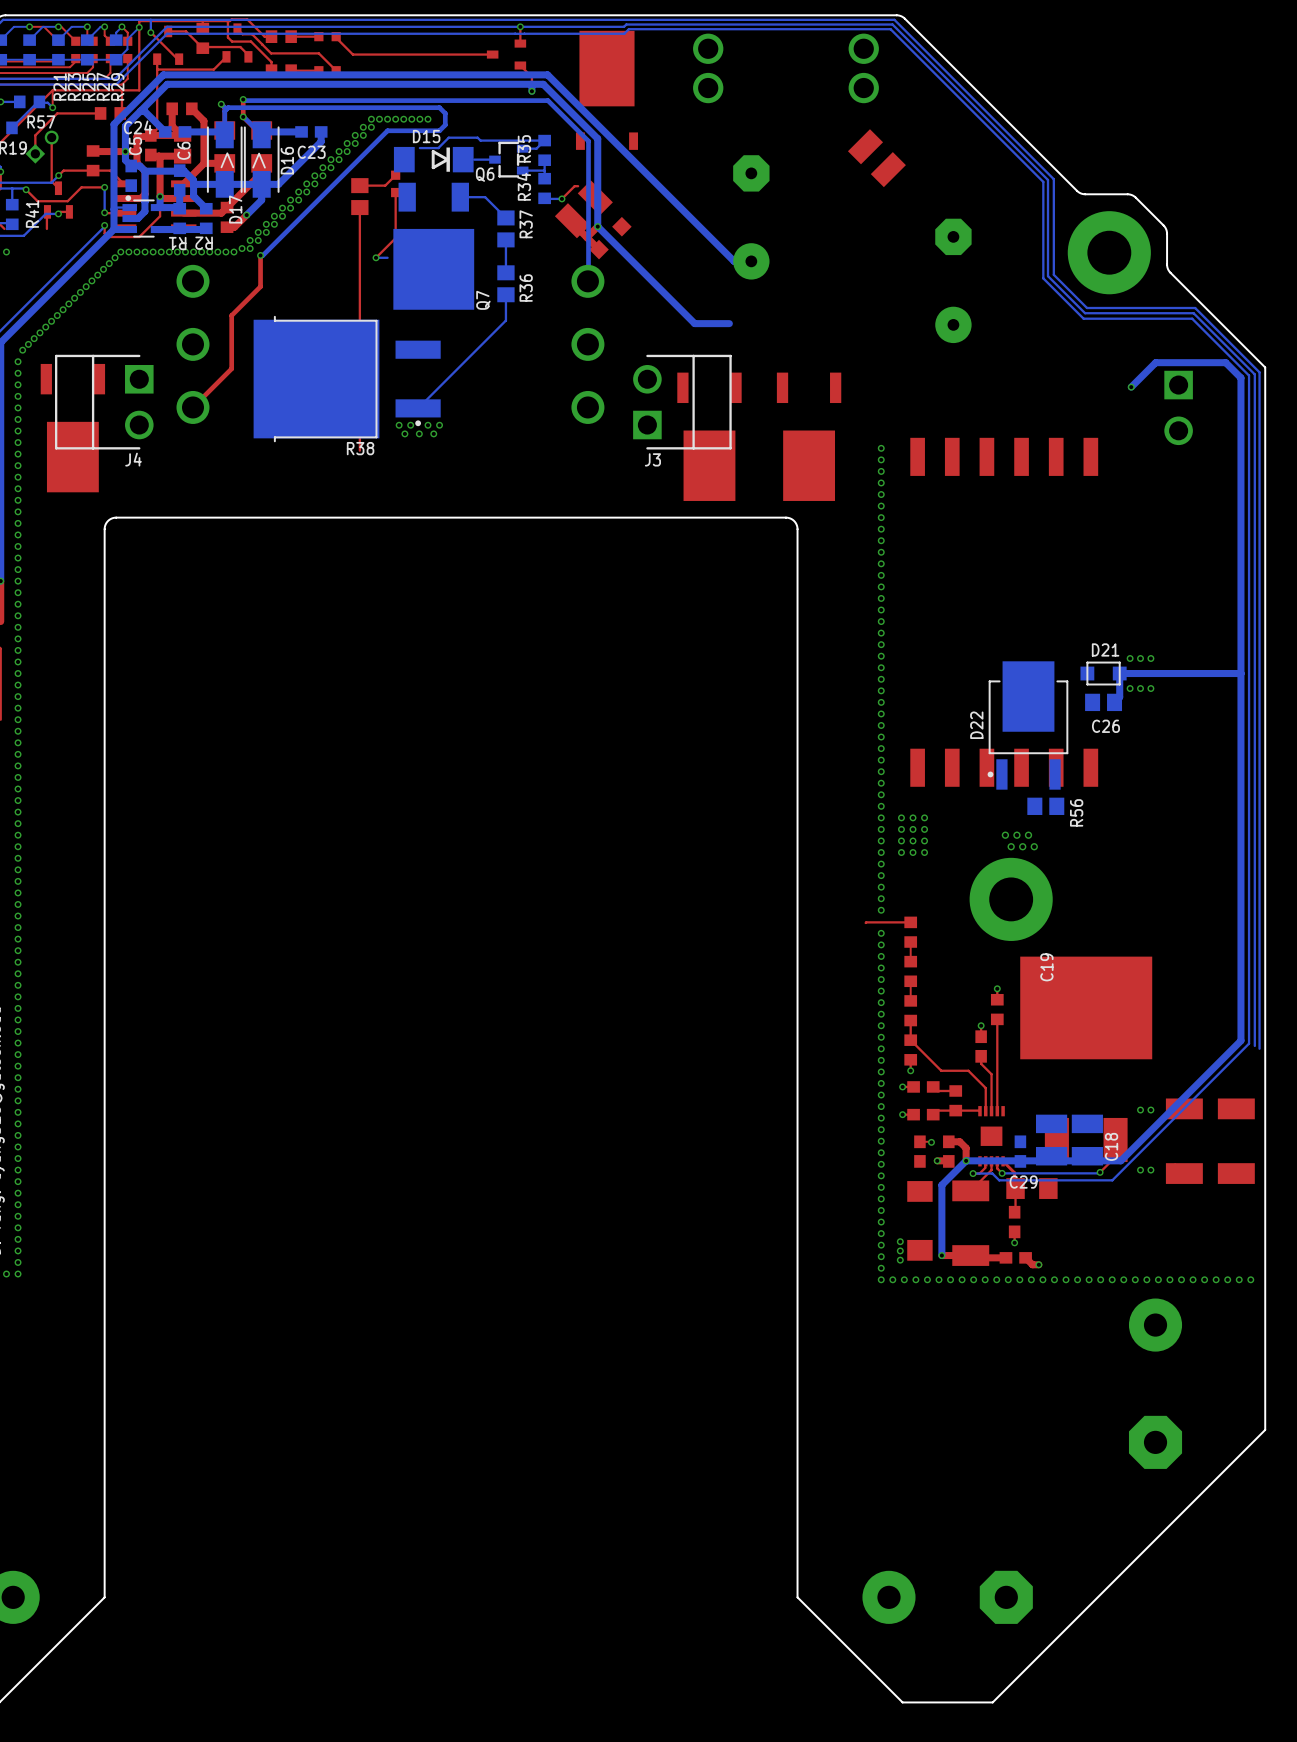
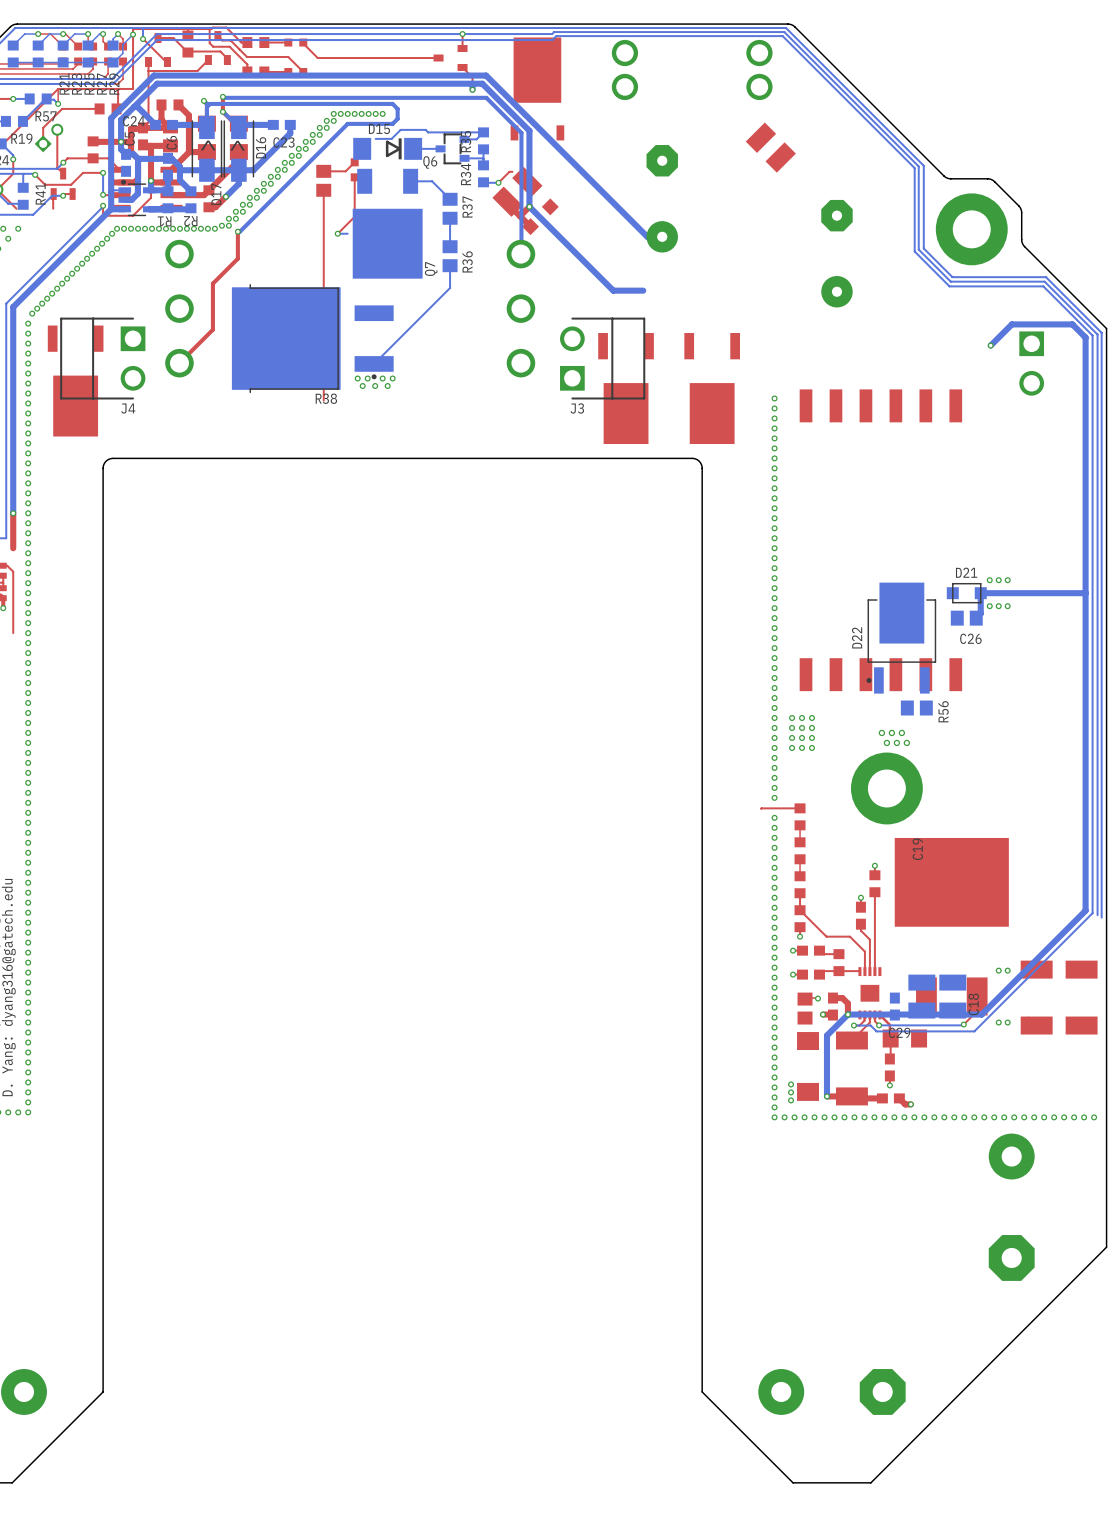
part footprint: [914, 1135, 926, 1168] -> [797, 992, 813, 1025]

